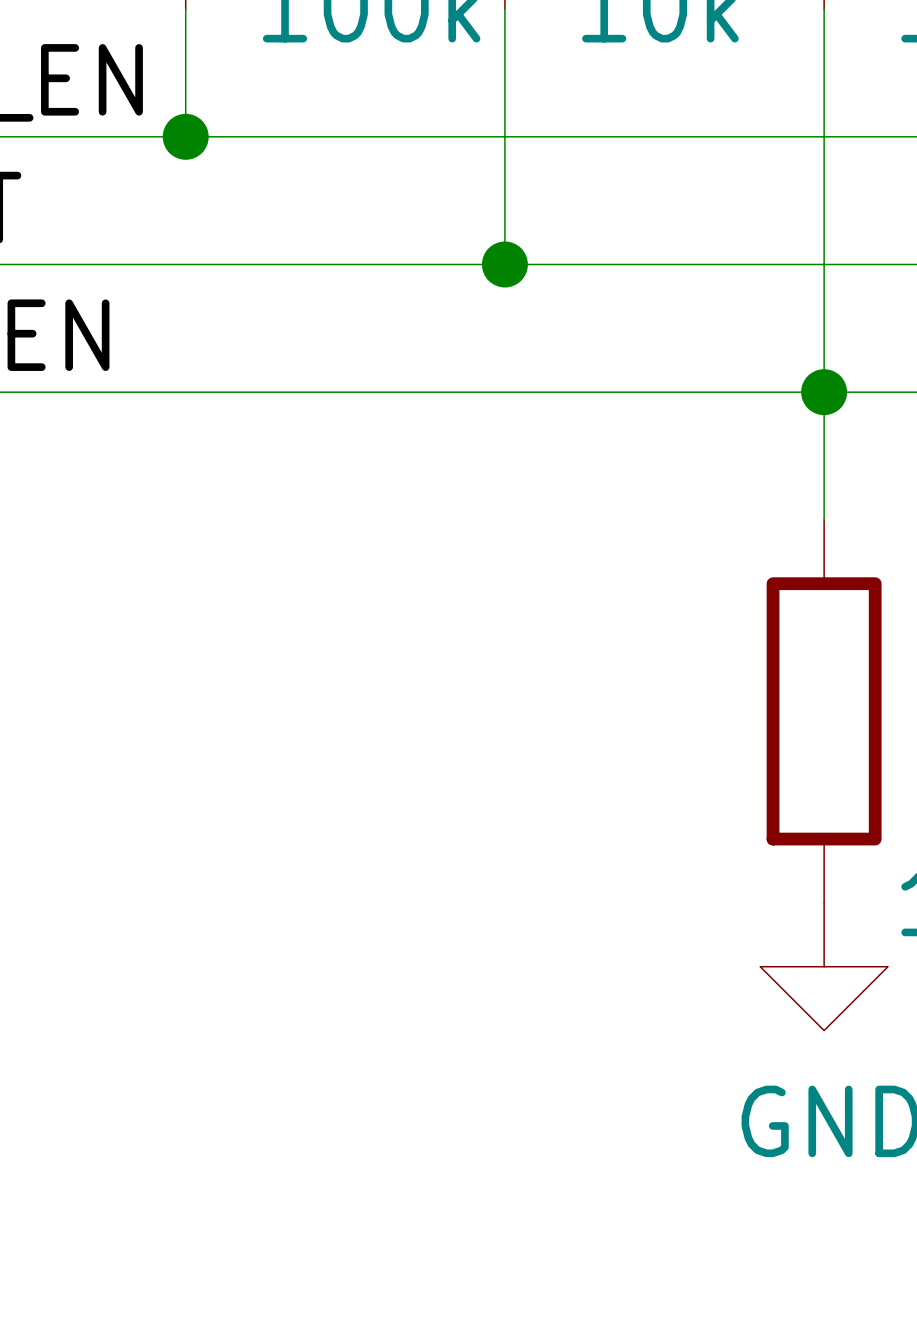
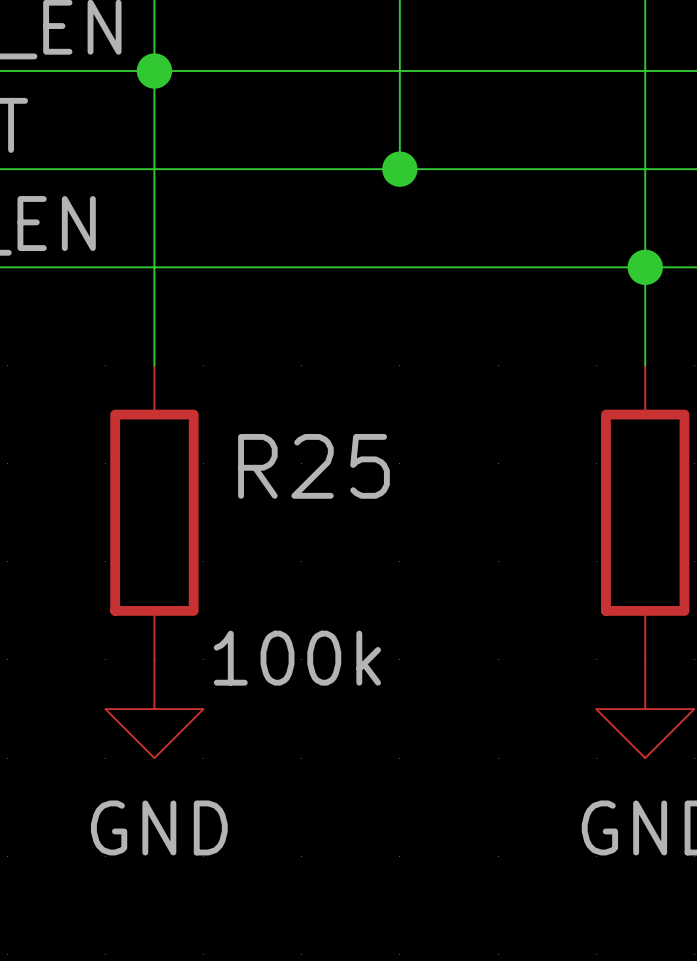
wire: none -> (154, 71) (154, 365)
R25: none -> (154, 512)
power symbol: none -> GND (154, 709)

